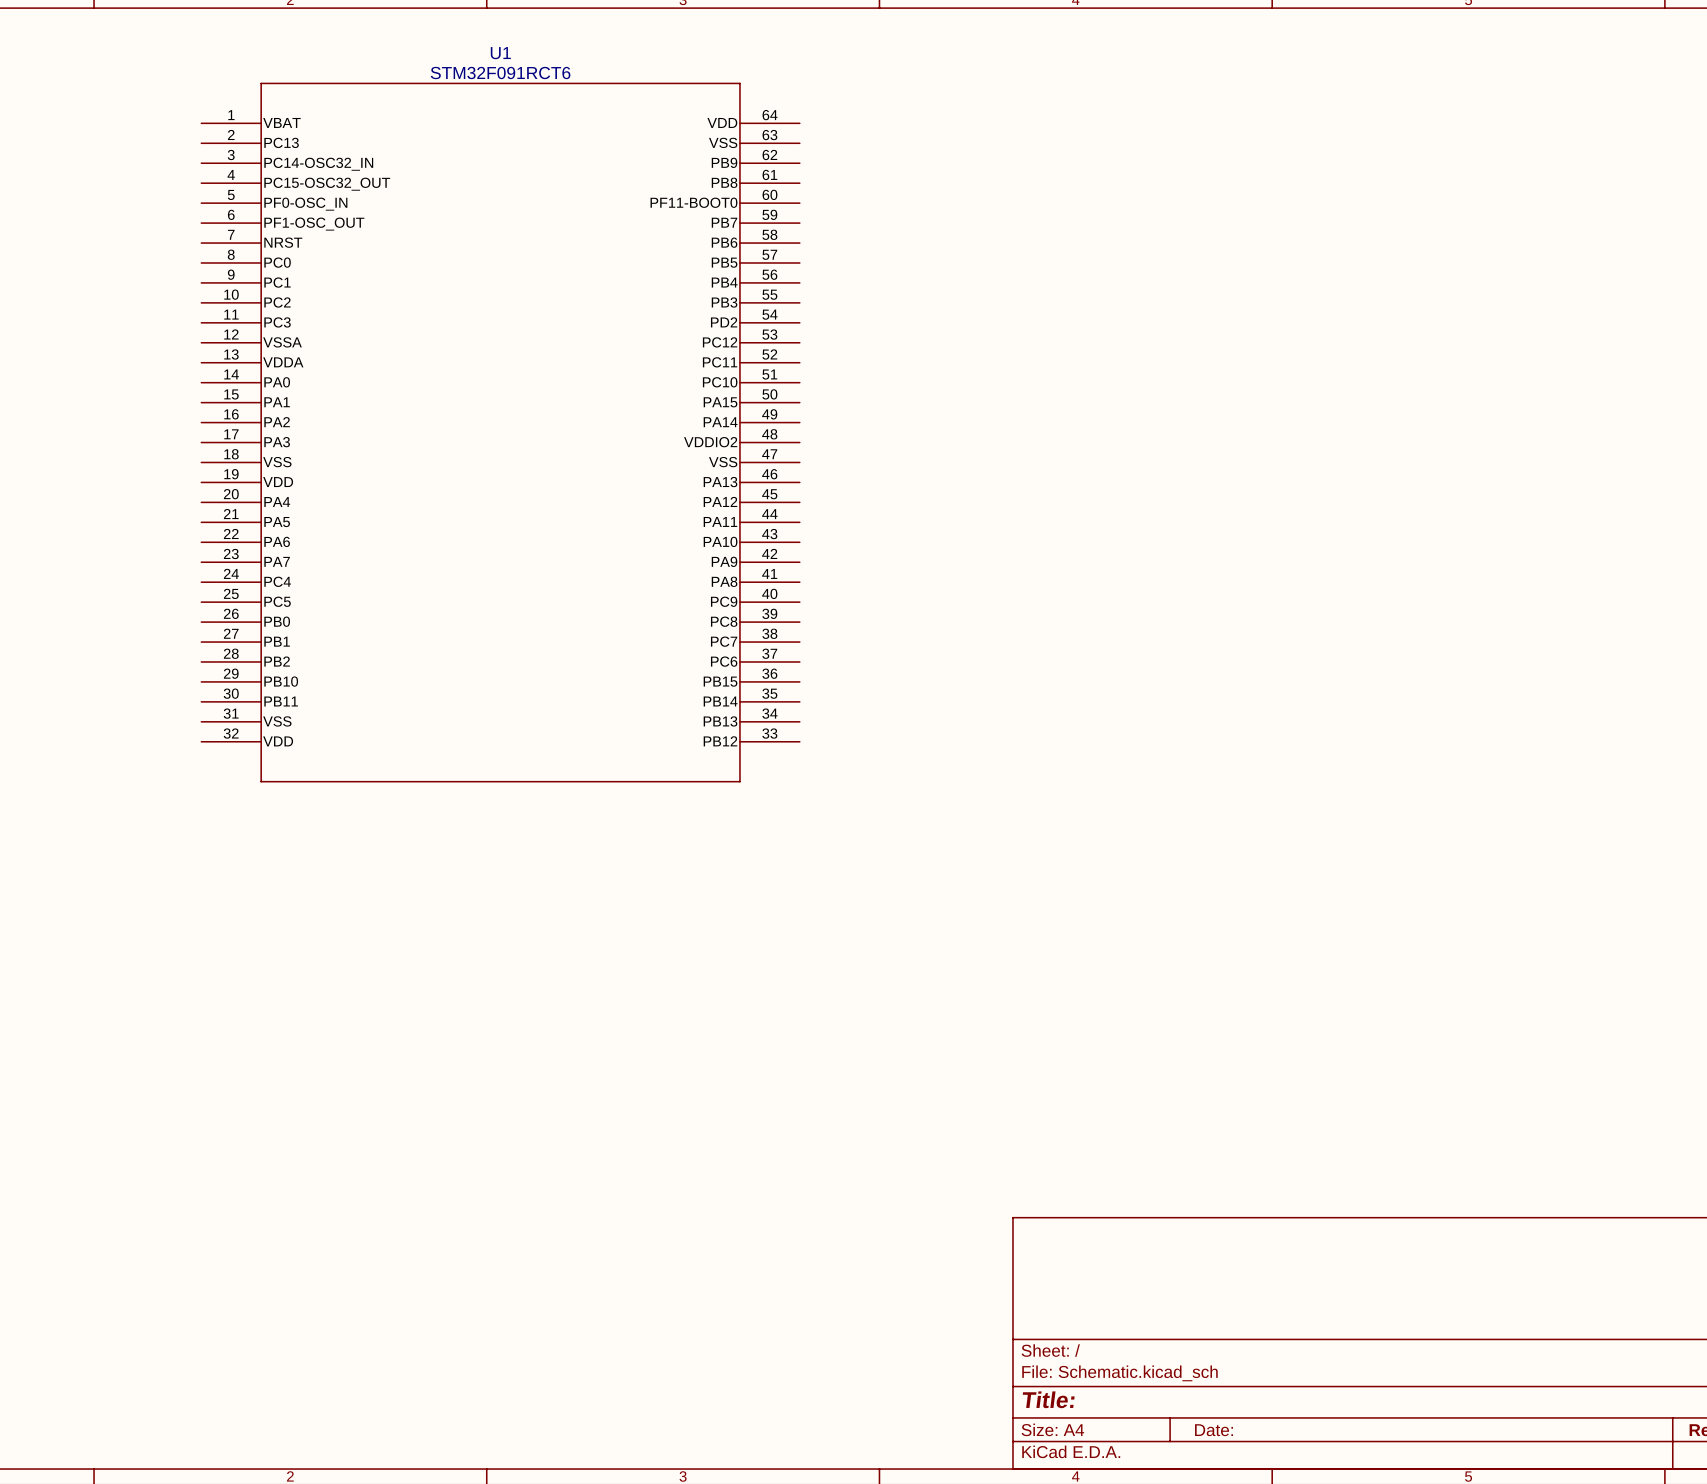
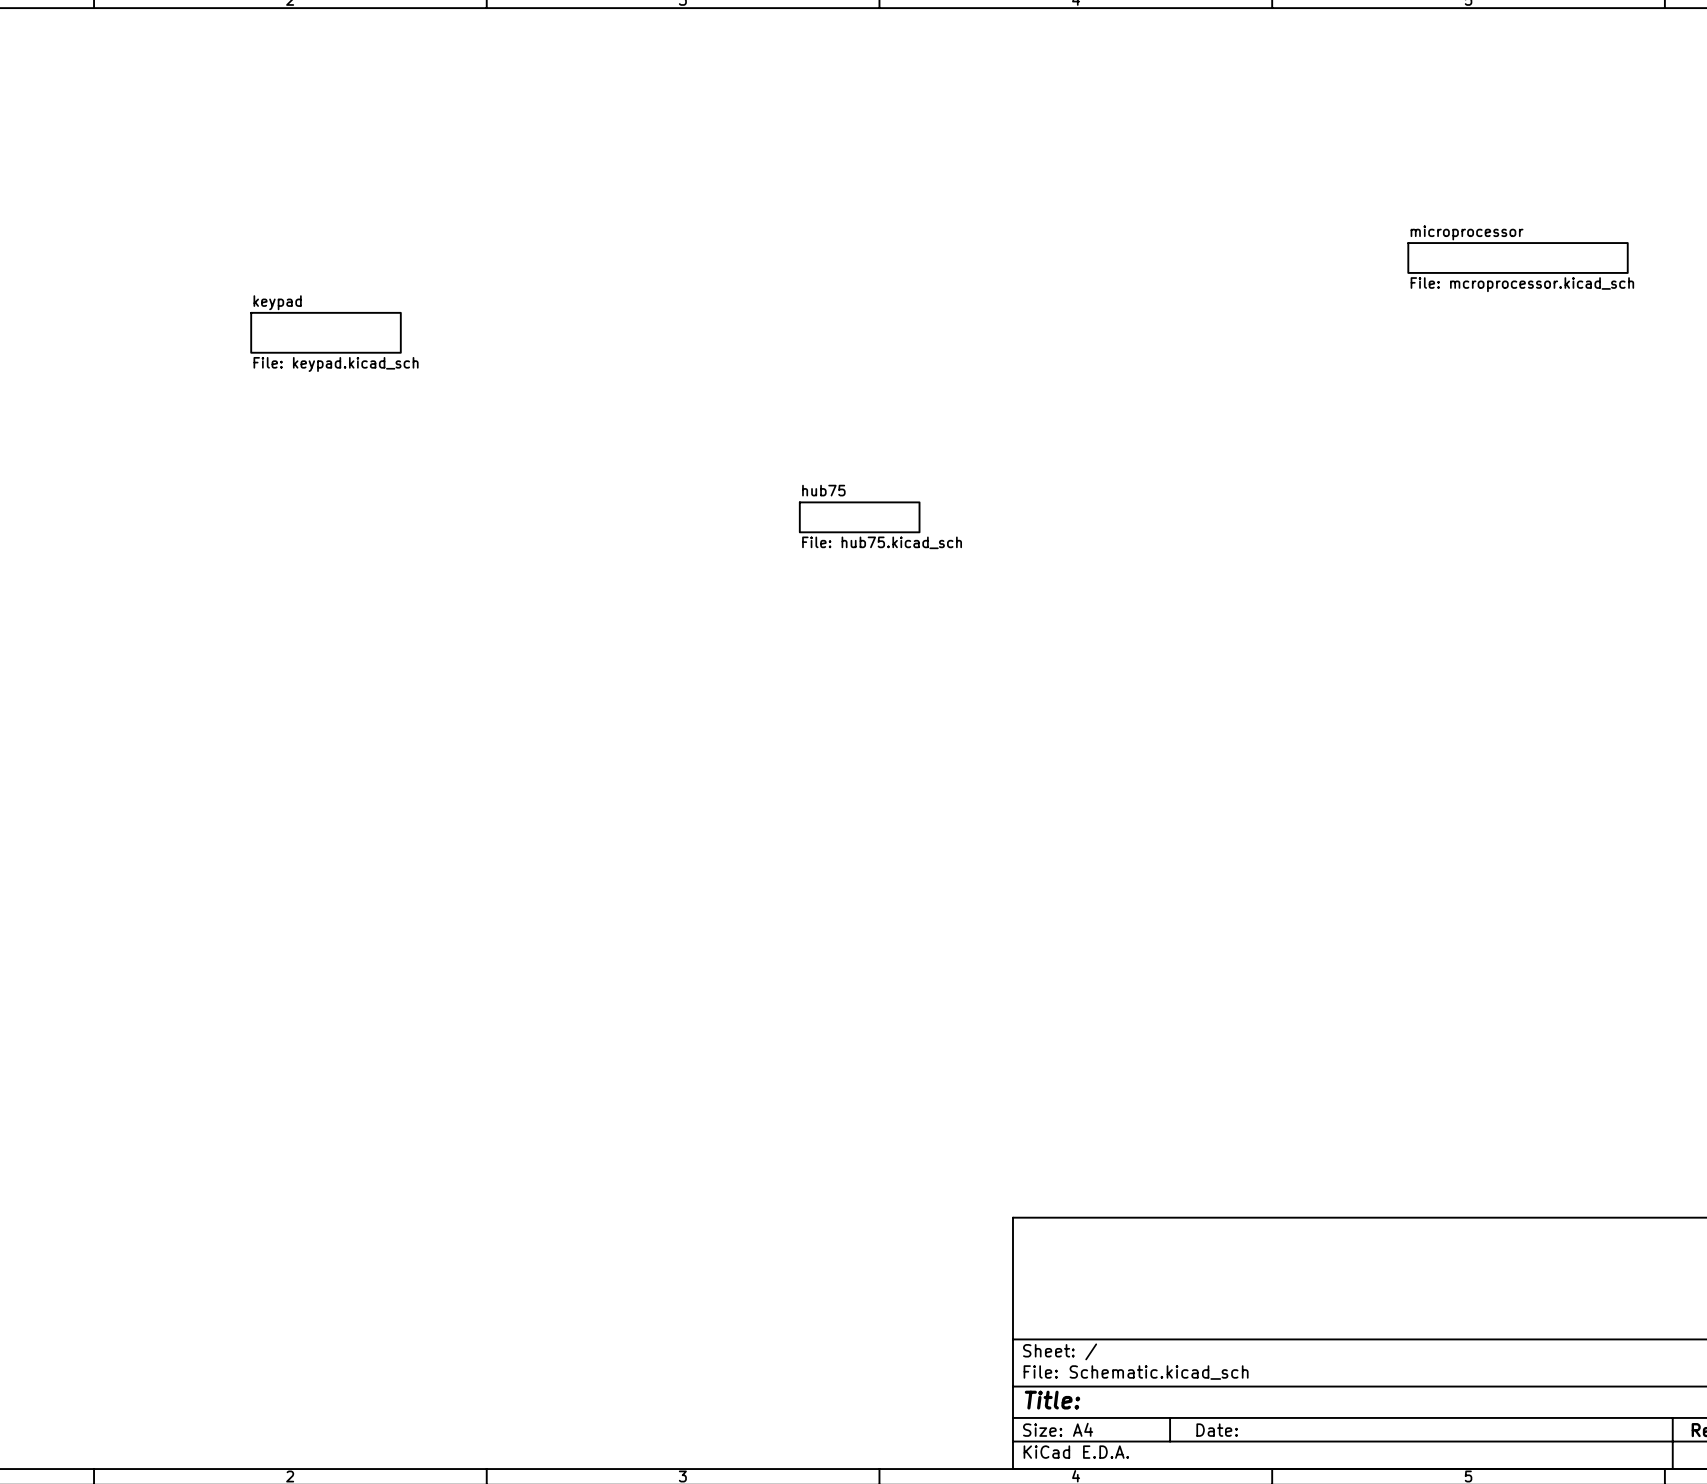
sheet microprocessor: none -> File: mcroprocessor.kicad_sch (1518, 257)
sheet keypad: none -> File: keypad.kicad_sch (326, 332)
U1: STM32F091RCT6 (500, 432) -> none
sheet hub75: none -> File: hub75.kicad_sch (859, 517)

